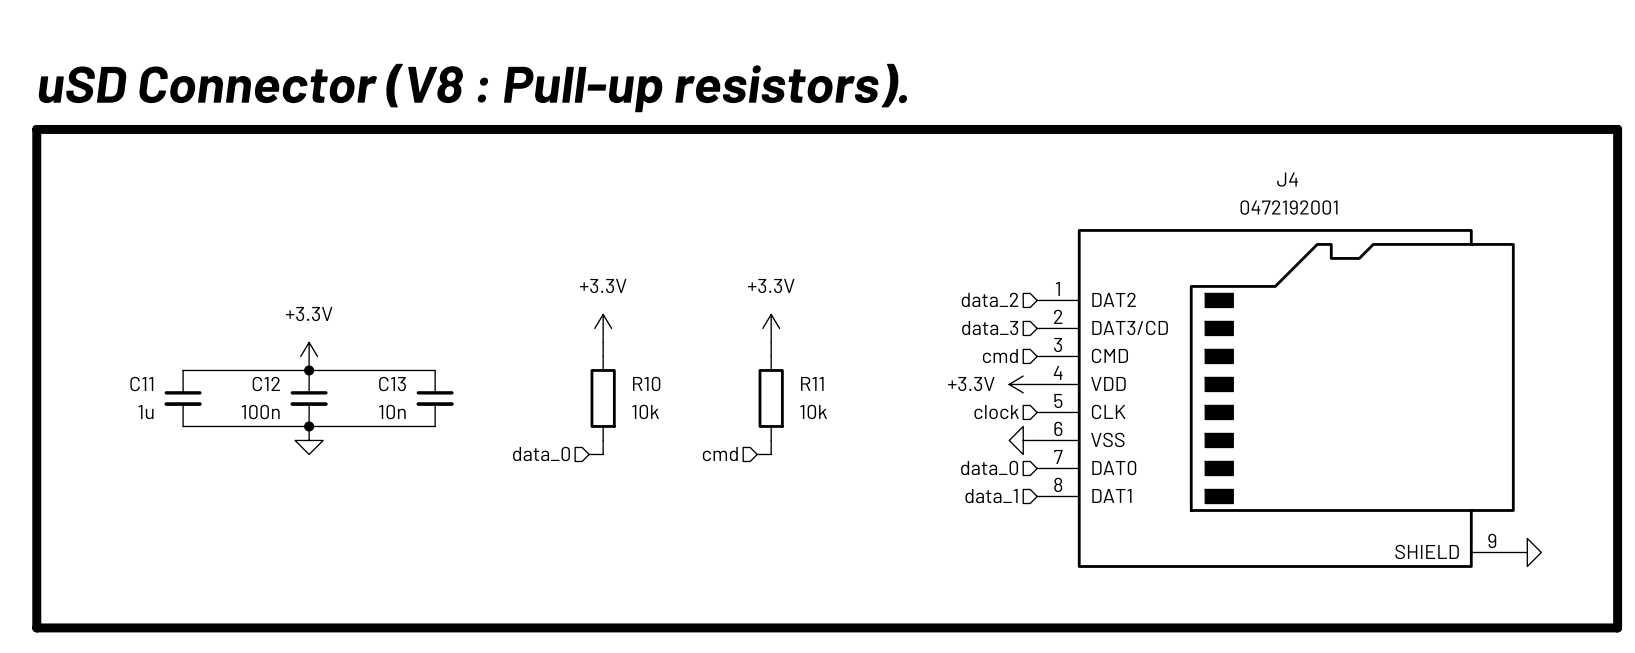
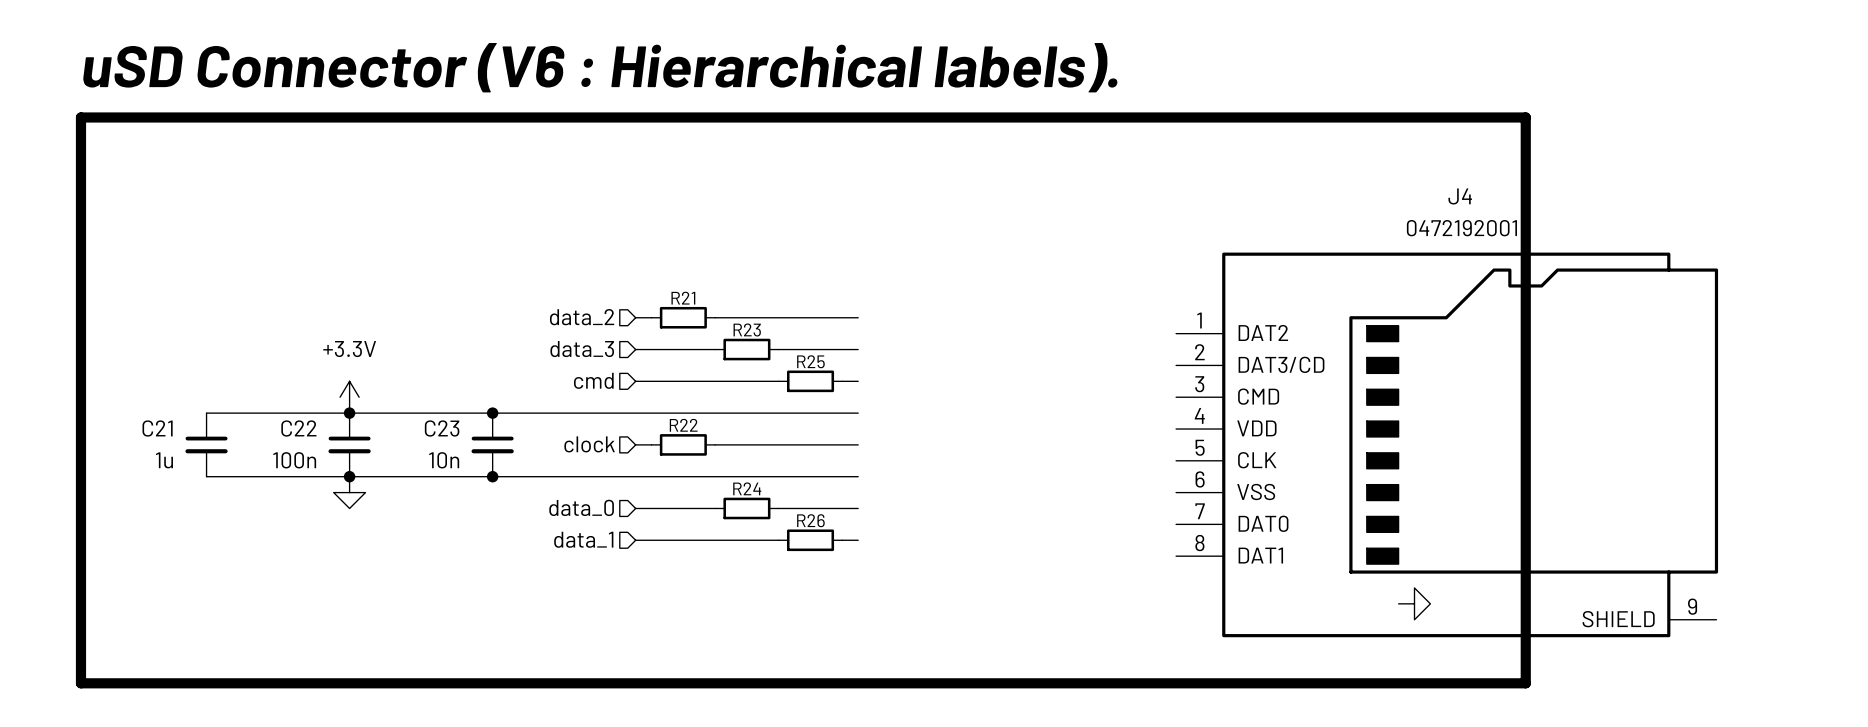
text: uSD Connector (V8 : Pull-up resistors). (472, 88) -> uSD Connector (V6 : Hierarchical labels). (600, 67)
line: (36, 129) (1617, 129) (1617, 627) (36, 627) (36, 129) -> (80, 117) (80, 683) (1525, 683) (1525, 117) (80, 117)
hierarchical label: none -> data_2 (582, 317)
wire: none -> (635, 317) (651, 317)
R21: none -> (683, 317)
wire: none -> (715, 317) (858, 317)
hierarchical label: data_2 (989, 299) -> none
hierarchical label: none -> data_3 (582, 349)
wire: none -> (635, 349) (715, 349)
R23: none -> (746, 349)
wire: none -> (778, 349) (858, 349)
power symbol: +3.3V (603, 328) -> none
power symbol: +3.3V (771, 328) -> none
hierarchical label: data_3 (990, 328) -> none
wire: none -> (635, 381) (778, 381)
wire: (603, 342) (603, 356) -> none
R25: none -> (810, 381)
wire: none -> (842, 381) (858, 381)
wire: (771, 342) (771, 356) -> none
hierarchical label: cmd (1000, 356) -> none
wire: none -> (492, 413) (858, 413)
junction: none -> (492, 413)
C11 name: C11 (141, 384) -> C21 (157, 428)
C12 name: C12 (266, 384) -> C22 (298, 428)
C13 name: C13 (392, 384) -> C23 (442, 428)
power symbol: +3.3V (1023, 384) -> none
hierarchical label: none -> clock (589, 444)
wire: none -> (635, 444) (651, 444)
R10: 10k (603, 398) -> none
R22: none -> (683, 444)
wire: none -> (715, 444) (858, 444)
R11: 10k (771, 398) -> none
hierarchical label: clock (996, 412) -> none
wire: none -> (492, 476) (858, 476)
junction: none -> (492, 476)
wire: (603, 440) (603, 454) -> (715, 508) (683, 508)
wire: (771, 440) (771, 454) (757, 454) -> (778, 508) (858, 508)
power symbol: (1023, 440) -> none
hierarchical label position: data_0 (541, 453) -> data_0 (581, 507)
wire: none -> (635, 508) (667, 508)
R24: none -> (746, 508)
hierarchical label position: cmd (720, 454) -> cmd (593, 380)
hierarchical label: data_0 (989, 467) -> none
hierarchical label: none -> data_1 (583, 539)
wire: none -> (635, 540) (778, 540)
R26: none -> (810, 540)
wire: none -> (842, 540) (858, 540)
hierarchical label: data_1 (991, 496) -> none
power symbol: none -> (1414, 603)
power symbol: (1527, 552) -> none

